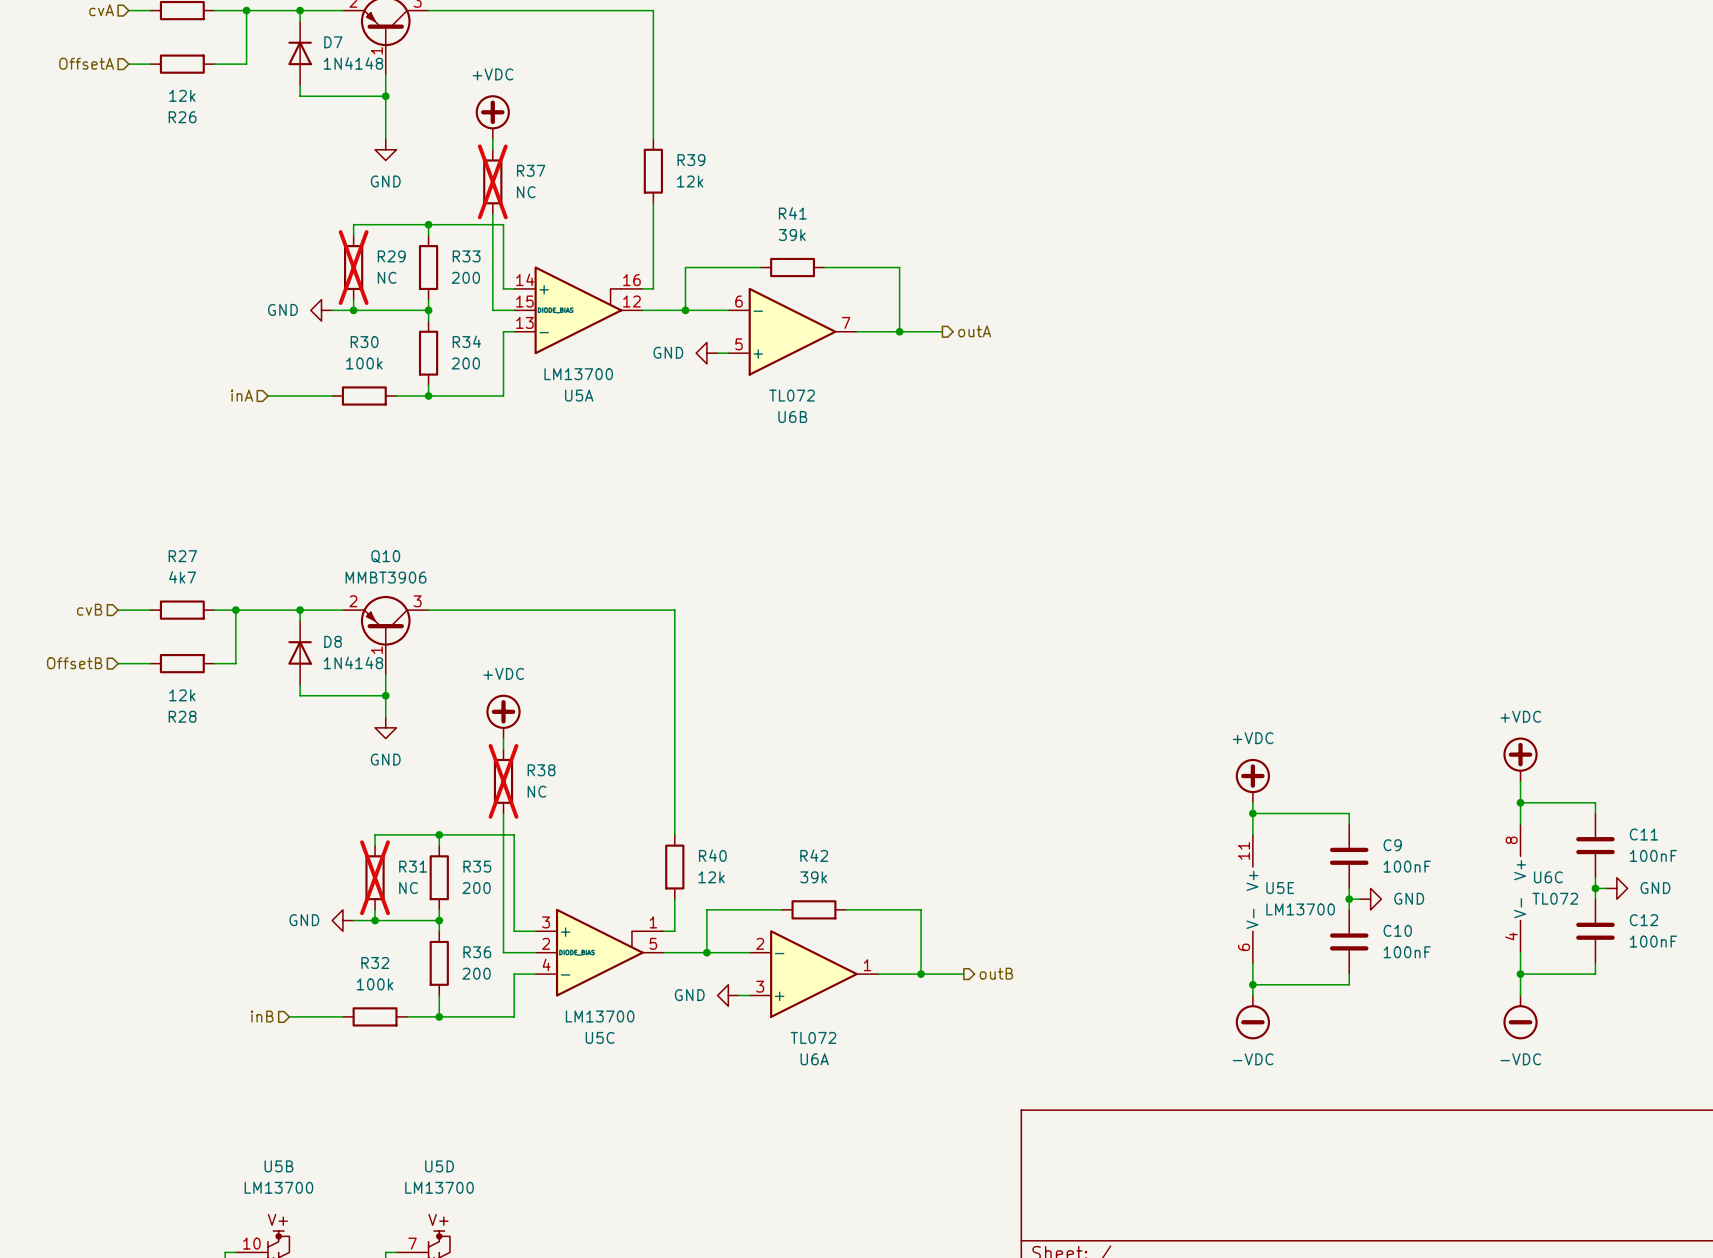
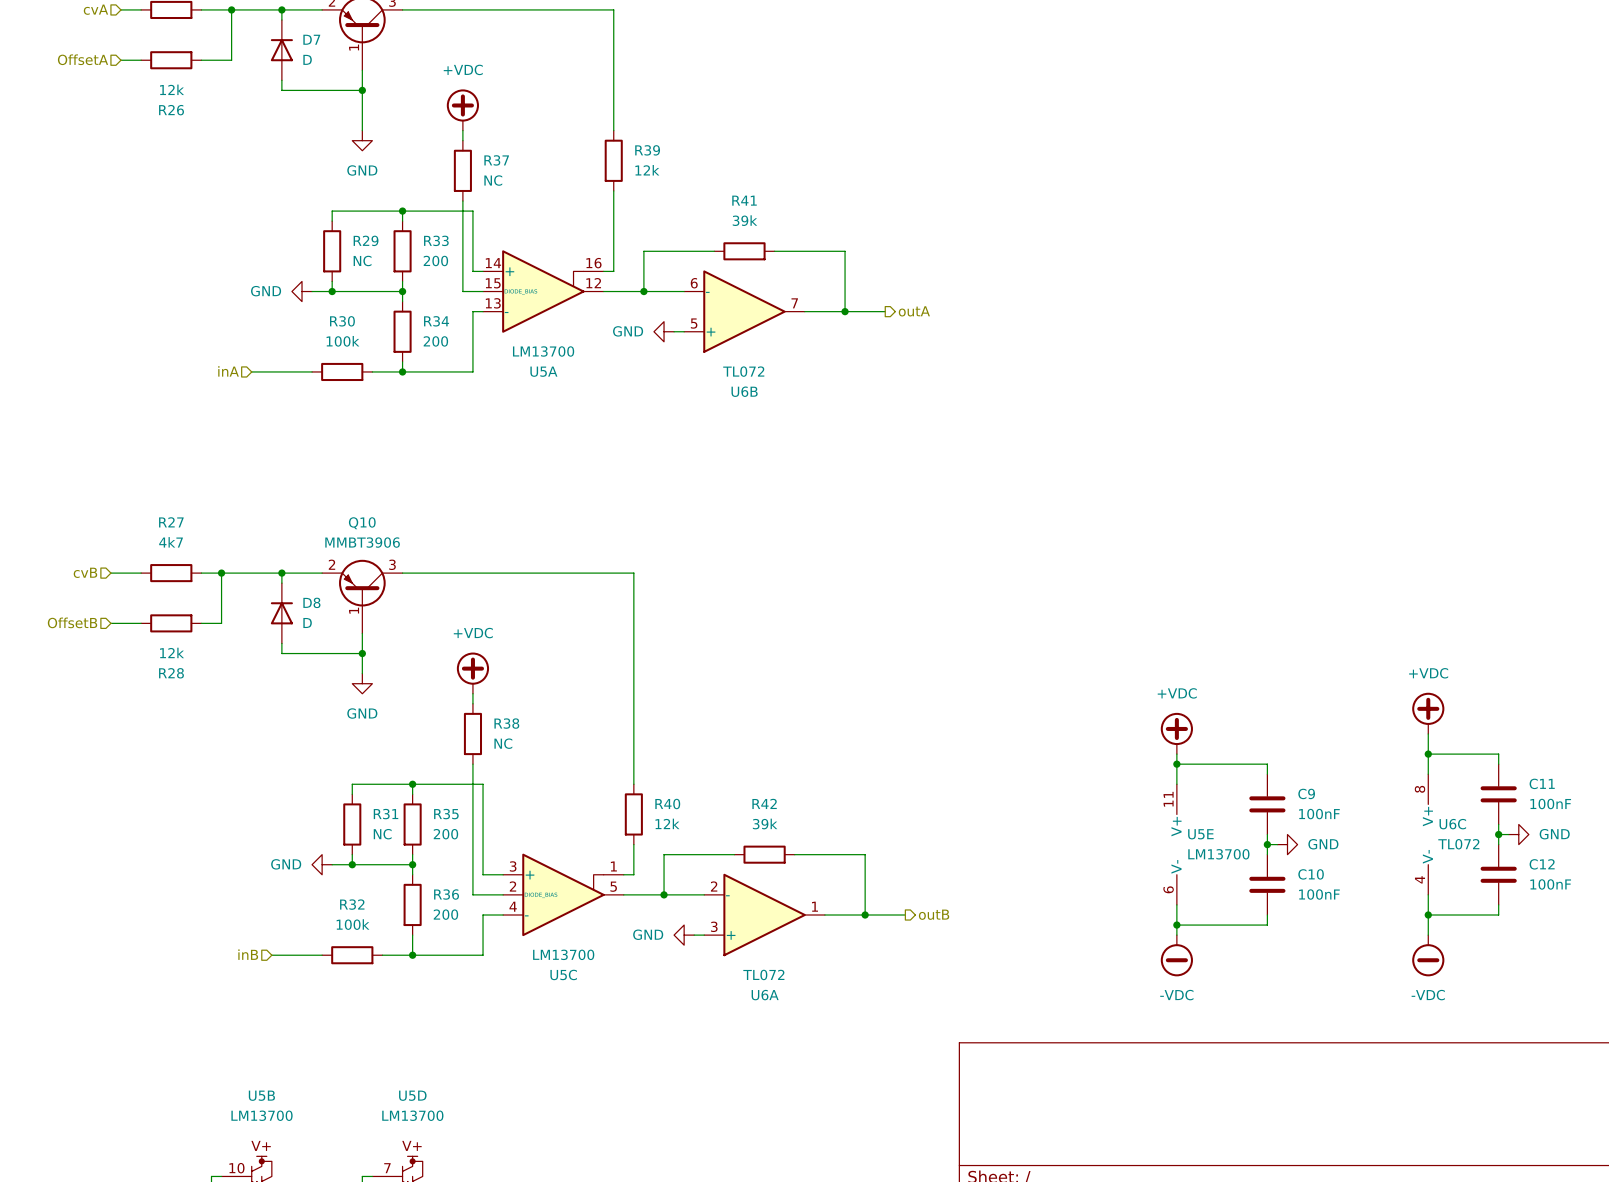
D7 value: 1N4148 (353, 63) -> D (307, 59)
R37 do-not-place cross: (492, 181) -> none
R29 do-not-place cross: (353, 267) -> none
D8 value: 1N4148 (353, 662) -> D (307, 622)
R38 do-not-place cross: (503, 781) -> none
R31 do-not-place cross: (375, 877) -> none

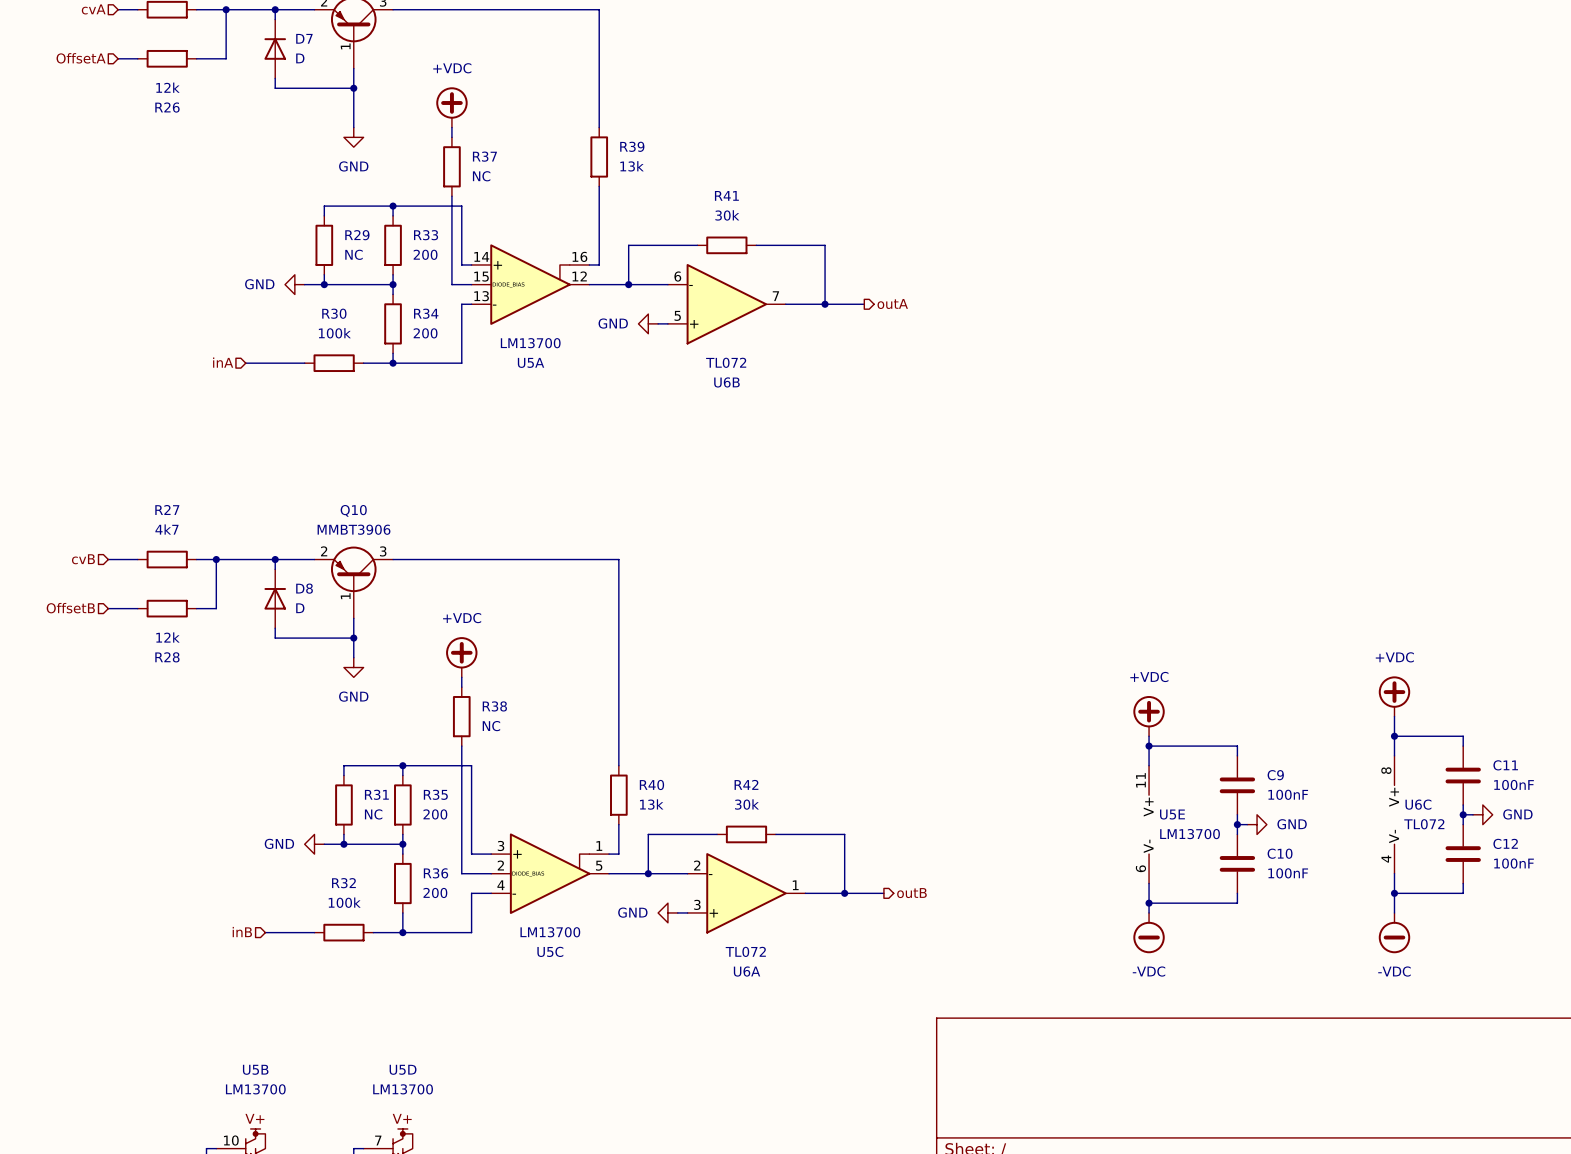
R39 value: 12k (647, 170) -> 13k (632, 166)
R41 value: 39k (744, 220) -> 30k (727, 215)
R40 value: 12k (667, 823) -> 13k (651, 804)
R42 value: 39k (765, 824) -> 30k (746, 804)

